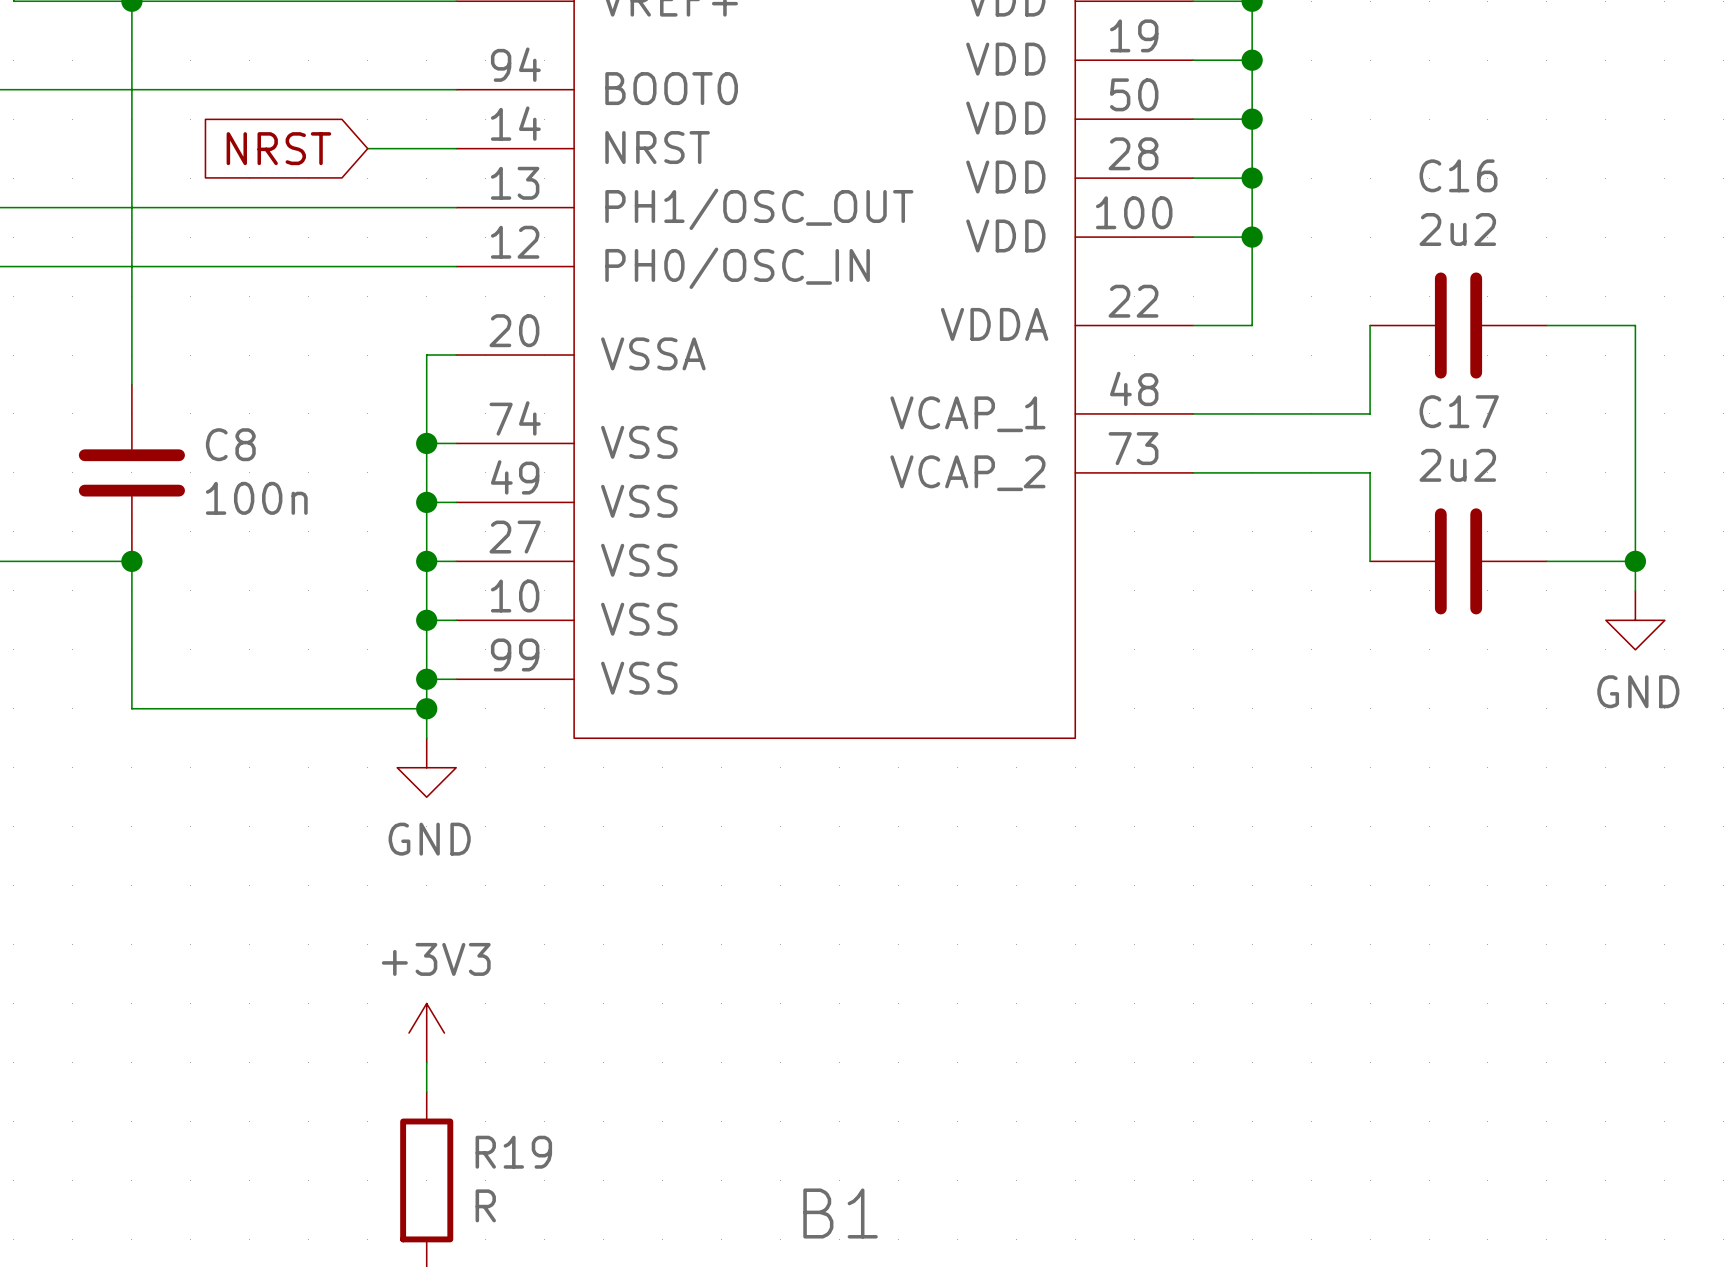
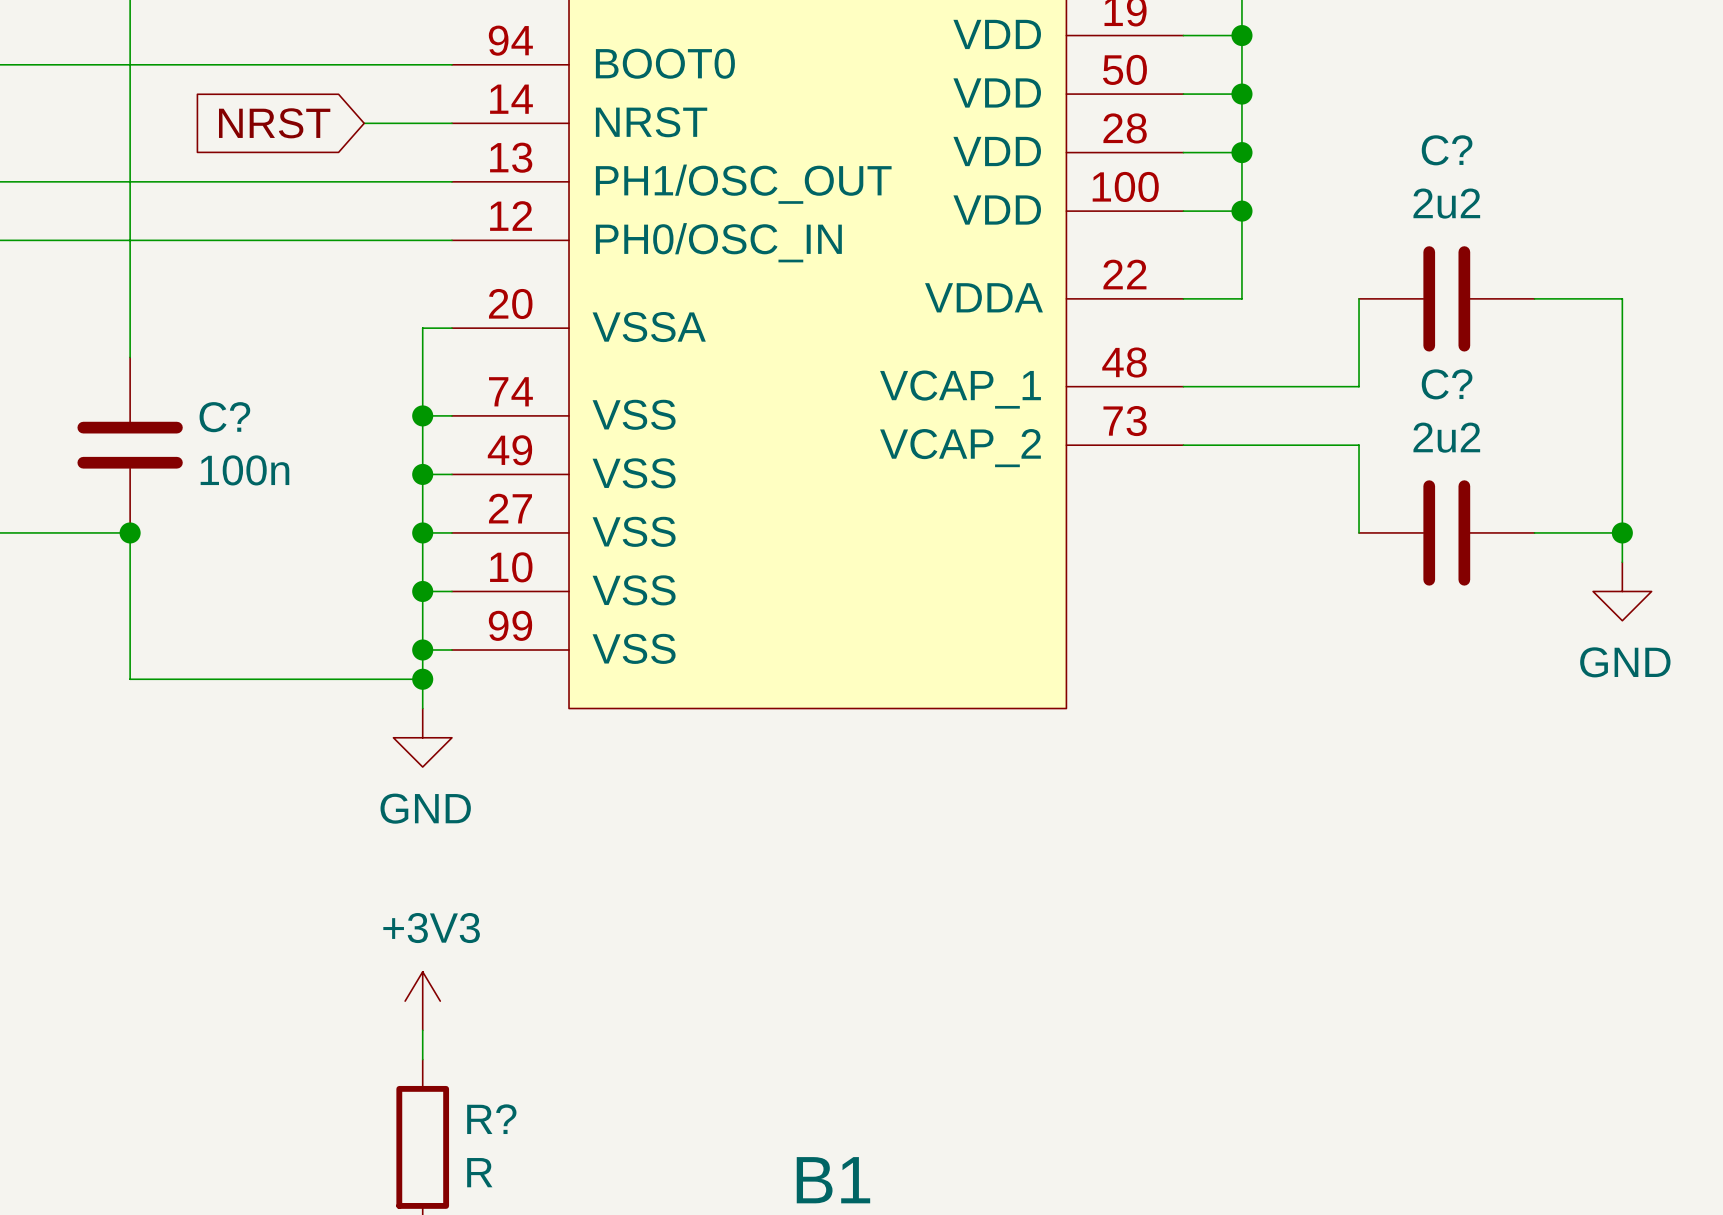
C16 name: C16 (1458, 175) -> C? (1447, 150)
C17 name: C17 (1459, 411) -> C? (1447, 384)
C8 name: C8 (230, 444) -> C? (224, 417)
R19 name: R19 (513, 1152) -> R? (491, 1119)

